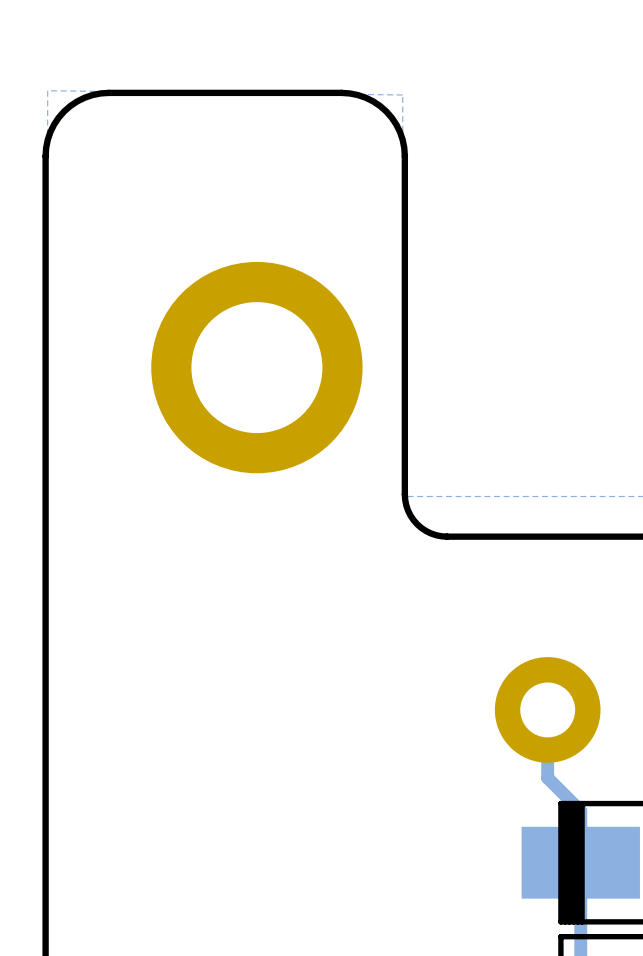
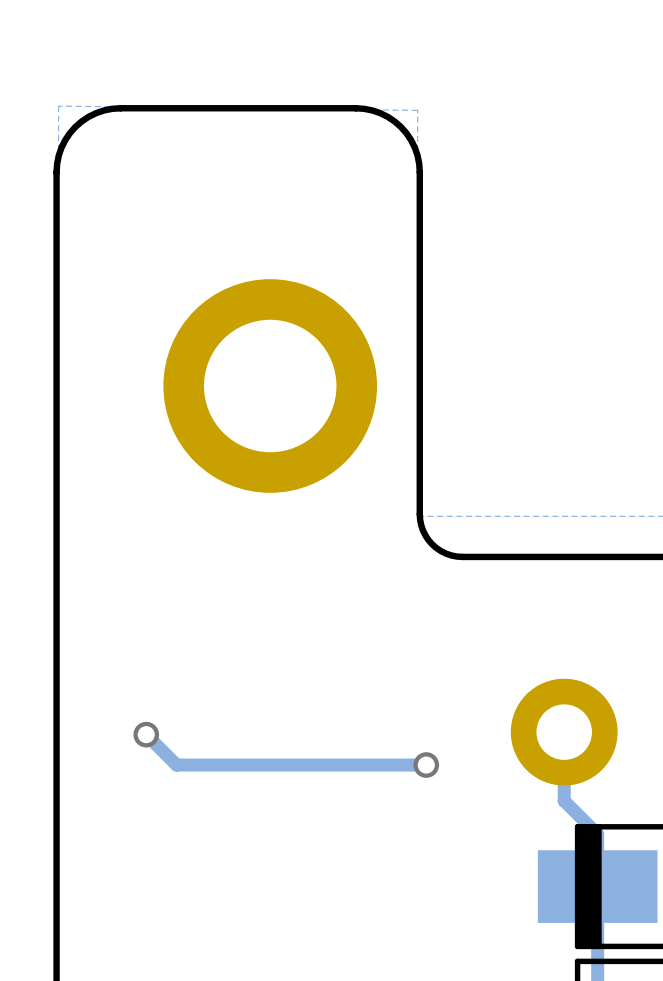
track: none -> (146, 734) (176, 765) (426, 765)
via: none -> (146, 734)
via: none -> (426, 765)

